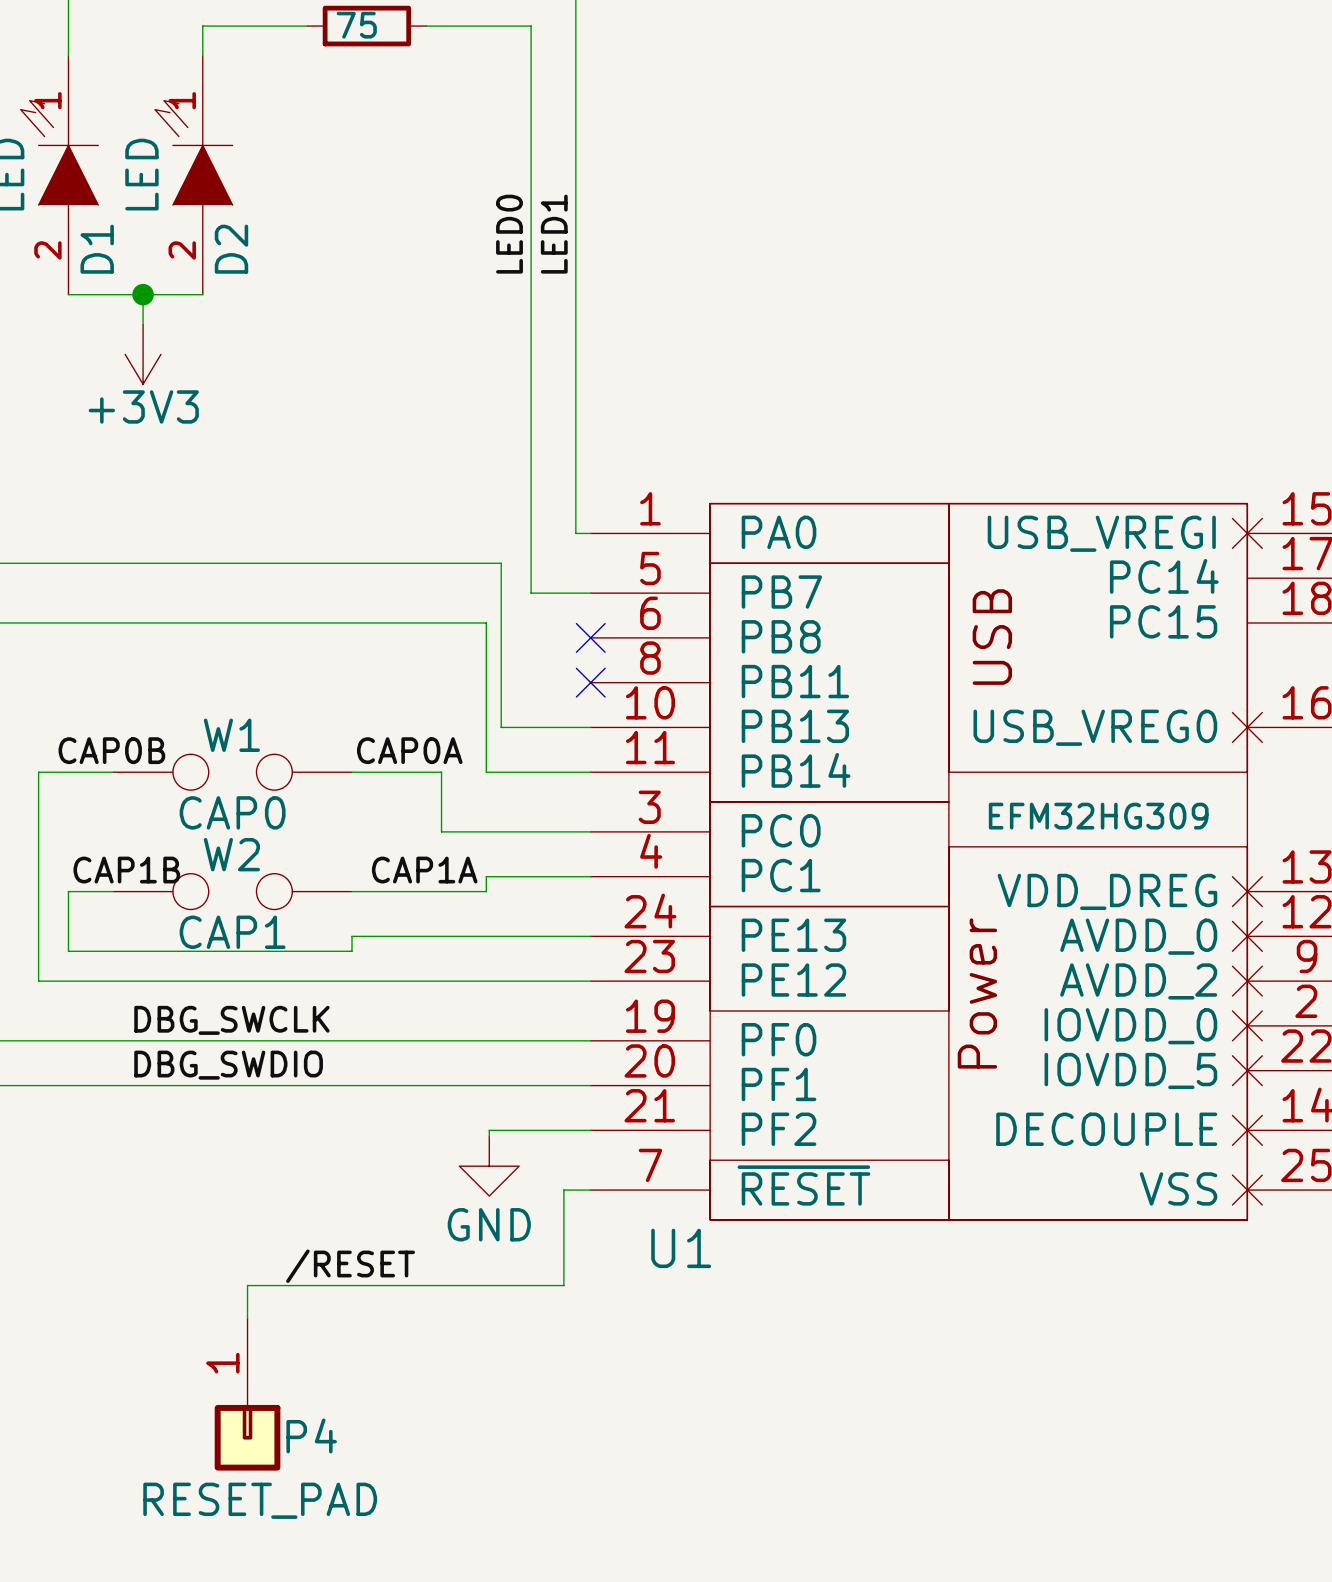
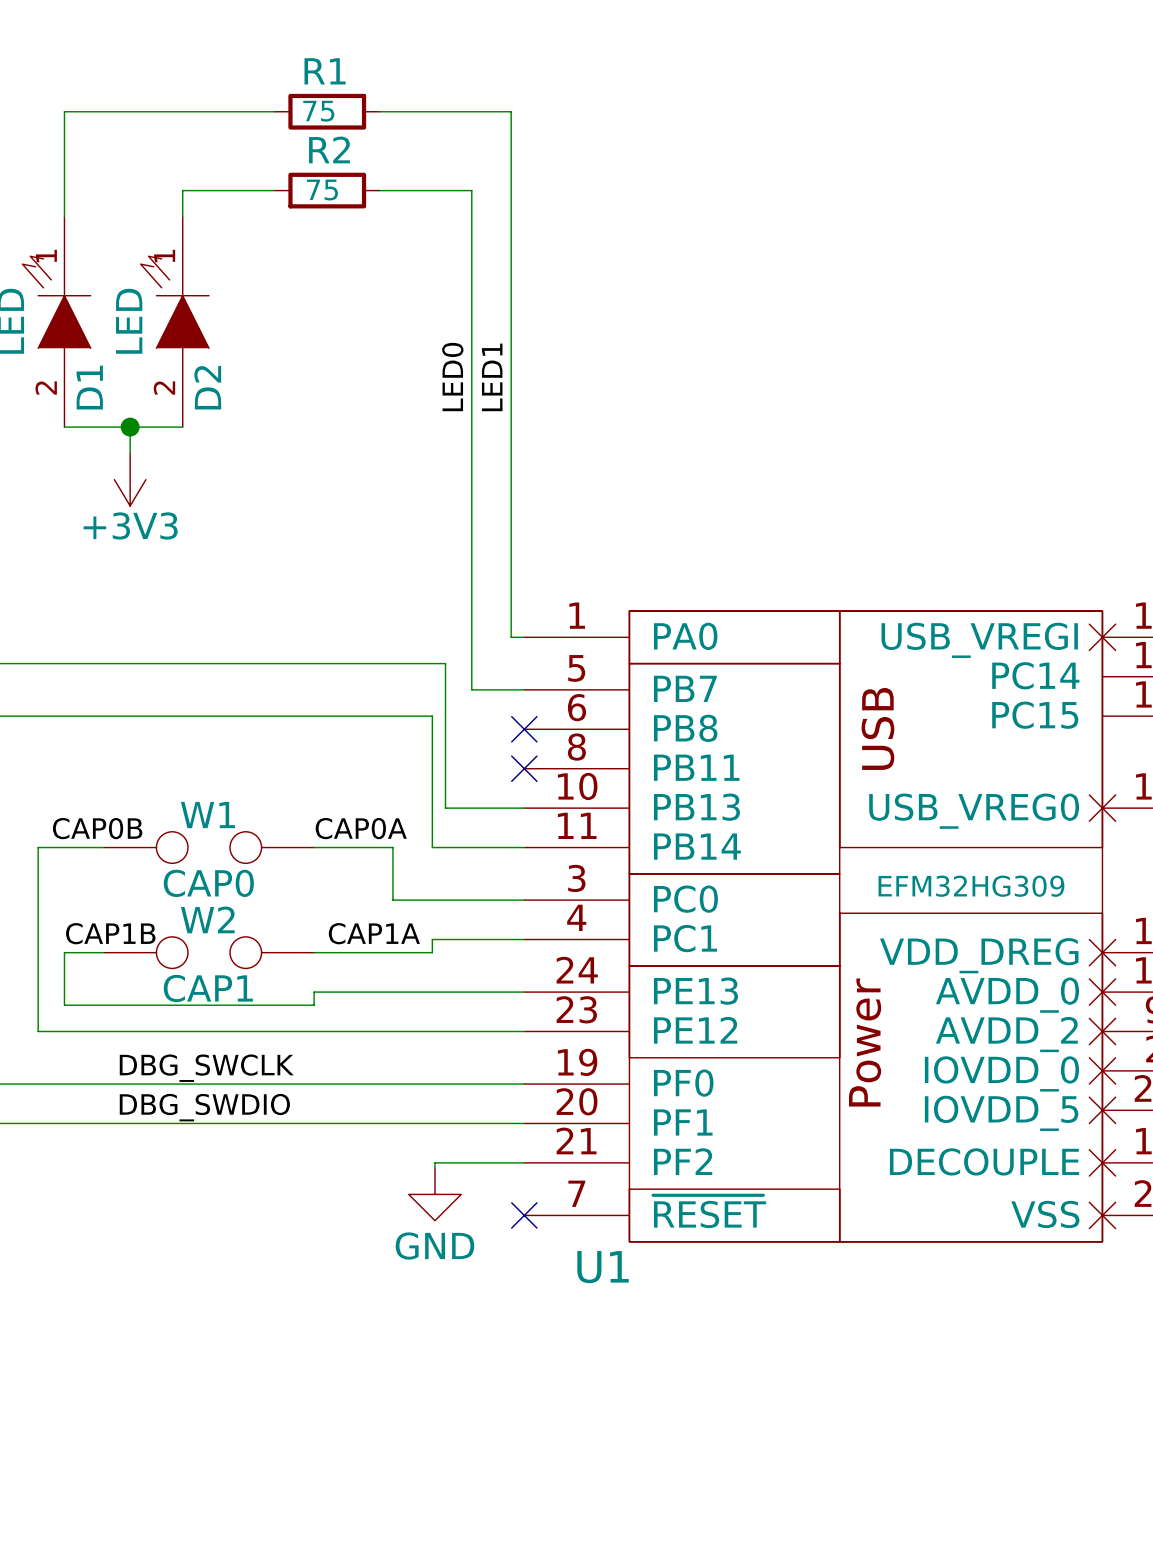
wire: (590, 1190) (563, 1190) (563, 1285) (247, 1285) (247, 1318) -> none
no-connect mark: none -> (524, 1215)
label: /RESET (350, 1266) -> none
P4: RESET_PAD (247, 1394) -> none

